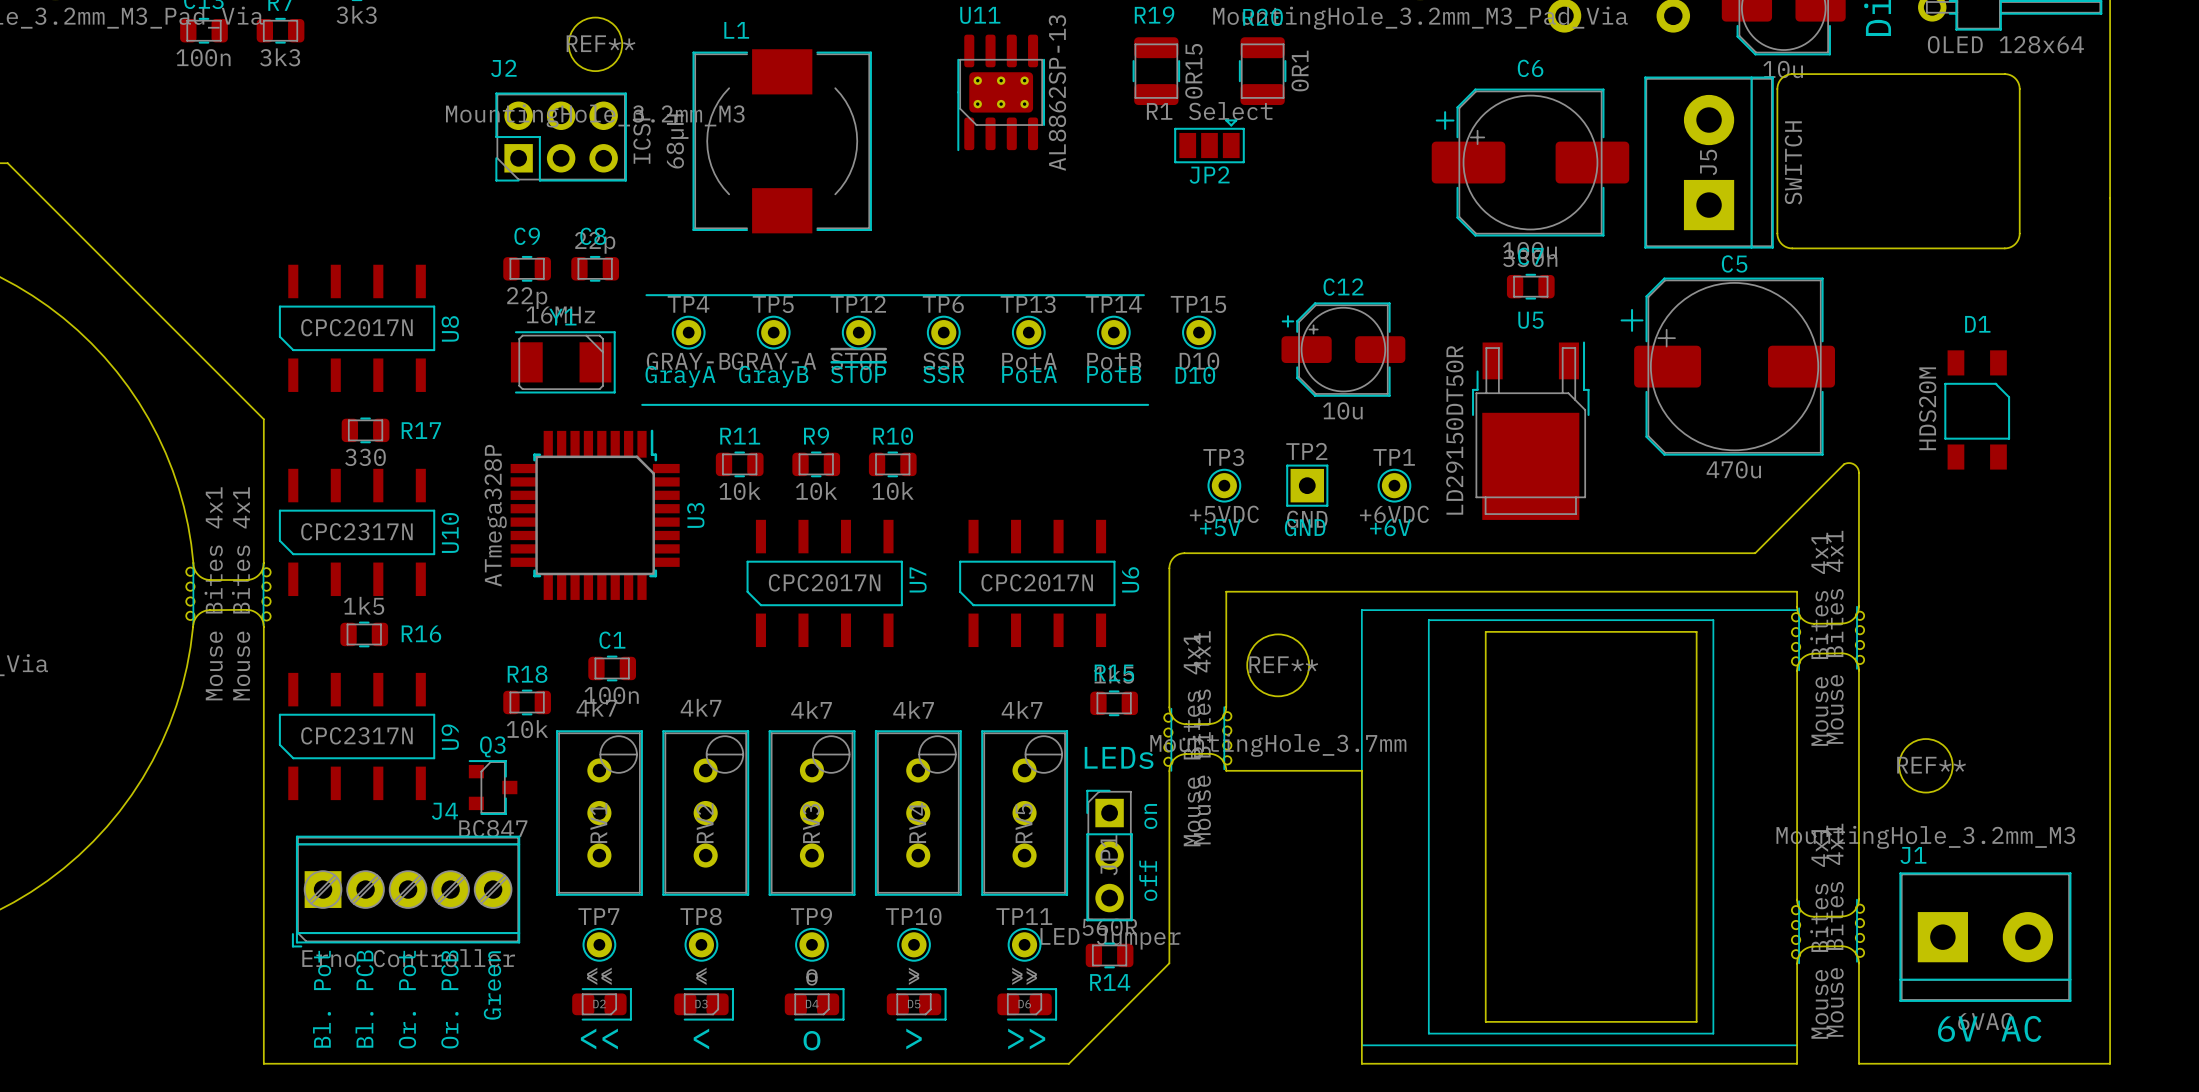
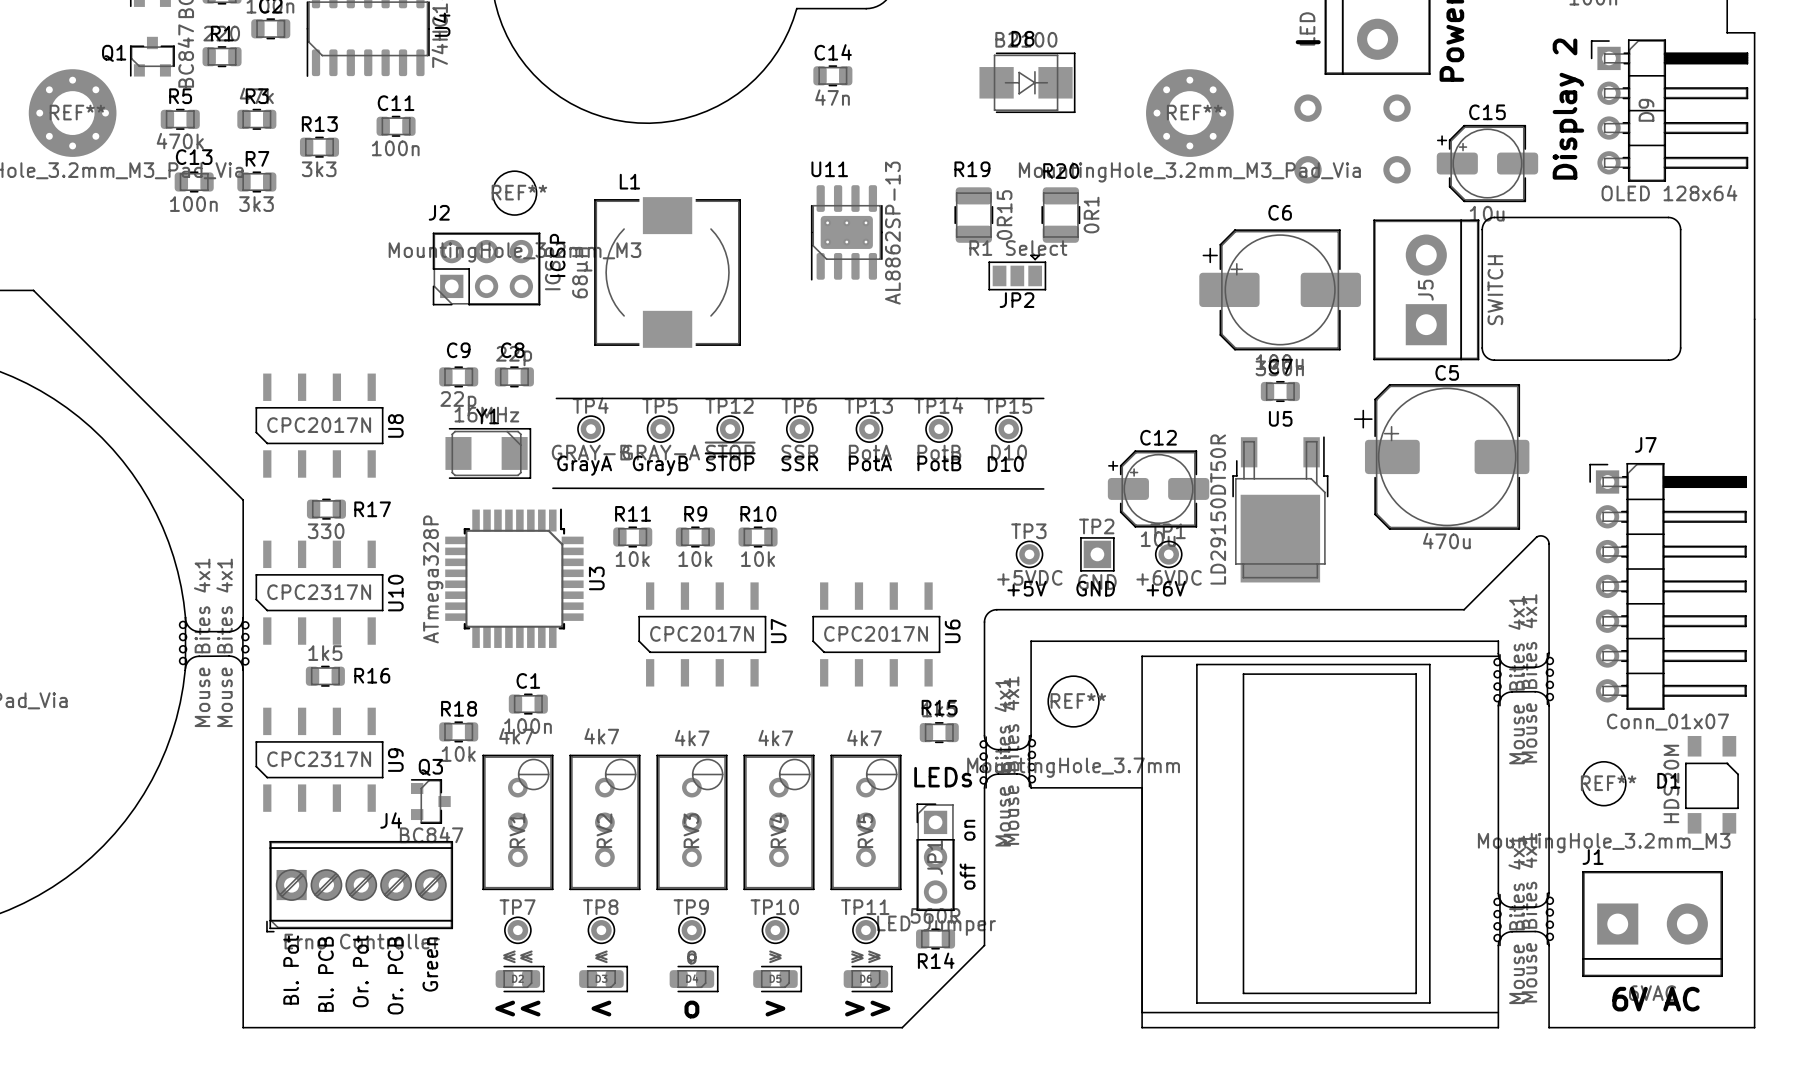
text: none -> ICSP (557, 255)
line: none -> (963, 398) (1043, 398)
D1 name position: D1 (1977, 324) -> D1 (1668, 780)
C12 position: (1343, 349) -> (1158, 488)
line: (642, 404) (1148, 404) -> (552, 488) (1043, 488)
D1 position: (1977, 409) -> (1711, 784)
J7: none -> Conn_01x07 (1668, 586)

